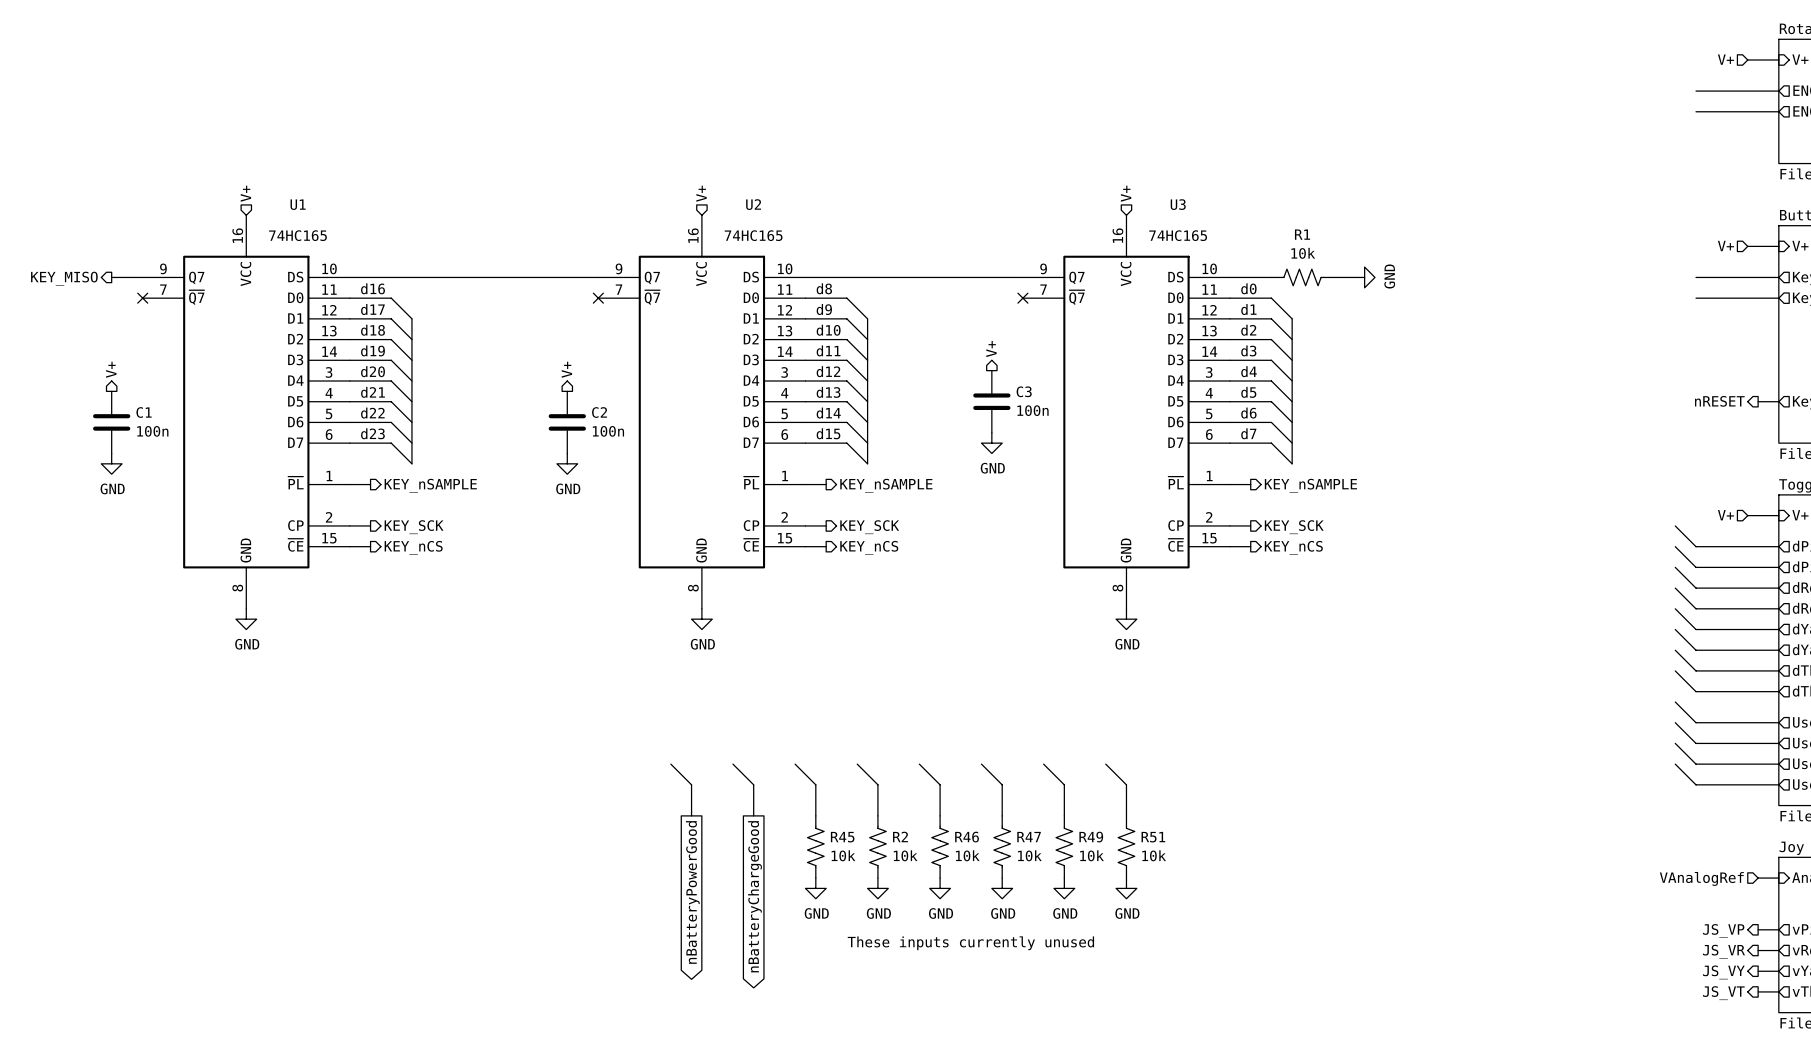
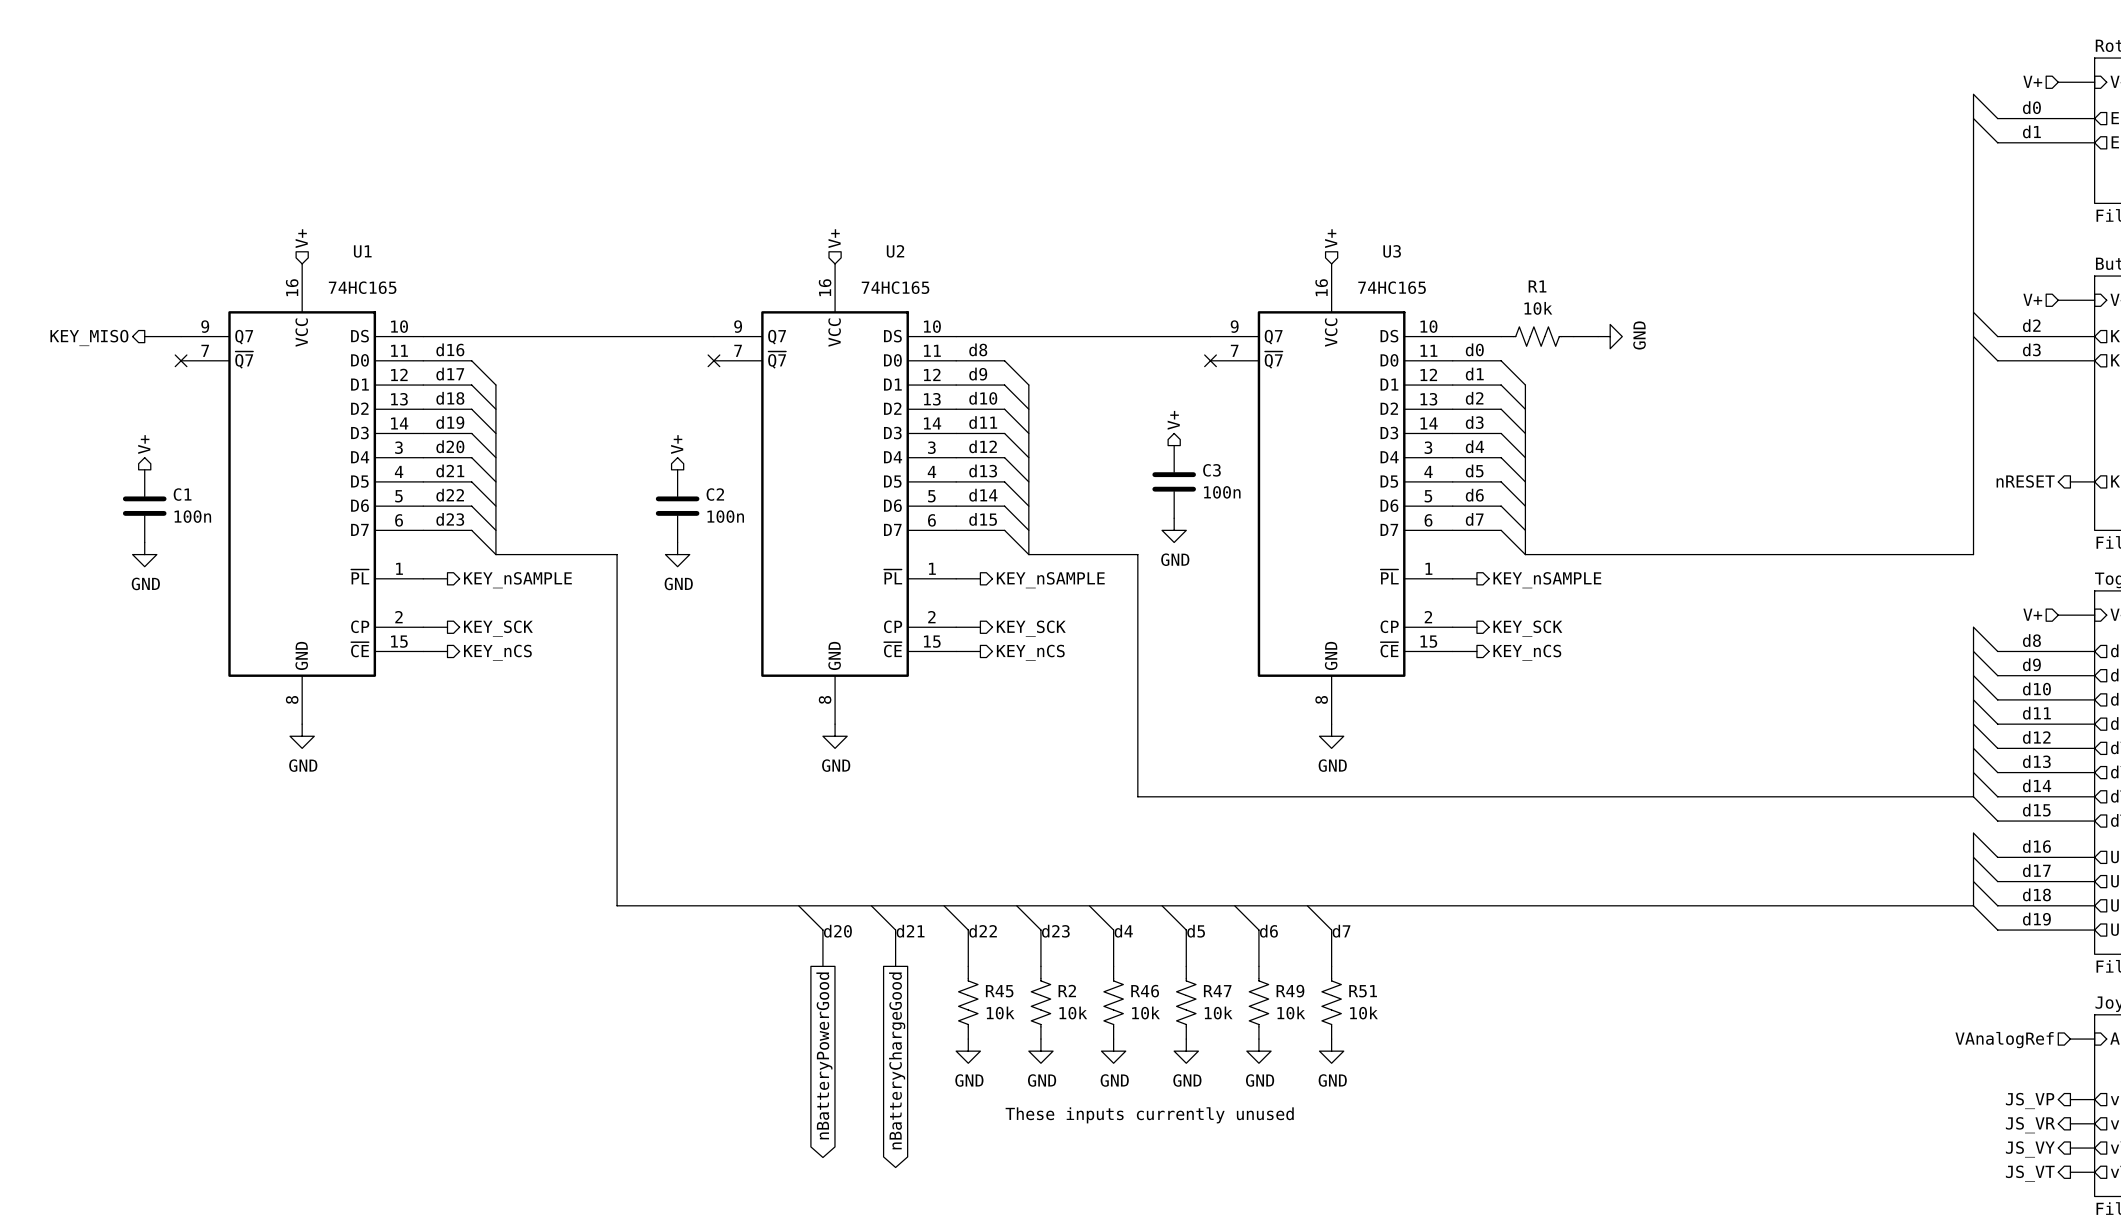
wire: none -> (1973, 94) (1997, 118)
bus: none -> (1973, 94) (1973, 554) (1525, 554)
label: none -> d0 (2031, 107)
wire: none -> (1973, 118) (1997, 142)
label: none -> d1 (2031, 131)
wire: none -> (1973, 312) (1997, 336)
label: none -> d2 (2031, 325)
wire: none -> (1973, 336) (1997, 360)
label: none -> d3 (2031, 349)
bus: none -> (495, 554) (617, 554) (617, 905) (1973, 905) (1973, 833)
bus: none -> (1028, 554) (1137, 554) (1137, 796) (1973, 796) (1973, 627)
label: none -> d8 (2031, 640)
label: none -> d9 (2031, 664)
label: none -> d10 (2036, 688)
label: none -> d11 (2036, 713)
label: none -> d12 (2036, 737)
label: none -> d13 (2036, 761)
label: none -> d14 (2037, 785)
label: none -> d15 (2036, 810)
label: none -> d16 (2036, 846)
label: none -> d17 (2036, 870)
label: none -> d18 (2036, 894)
label: none -> d19 (2036, 919)
label: none -> d20 (837, 931)
label: none -> d21 (910, 931)
label: none -> d22 (983, 931)
label: none -> d23 (1055, 931)
label: none -> d4 (1123, 931)
label: none -> d5 (1196, 931)
label: none -> d6 (1268, 931)
label: none -> d7 (1341, 931)

